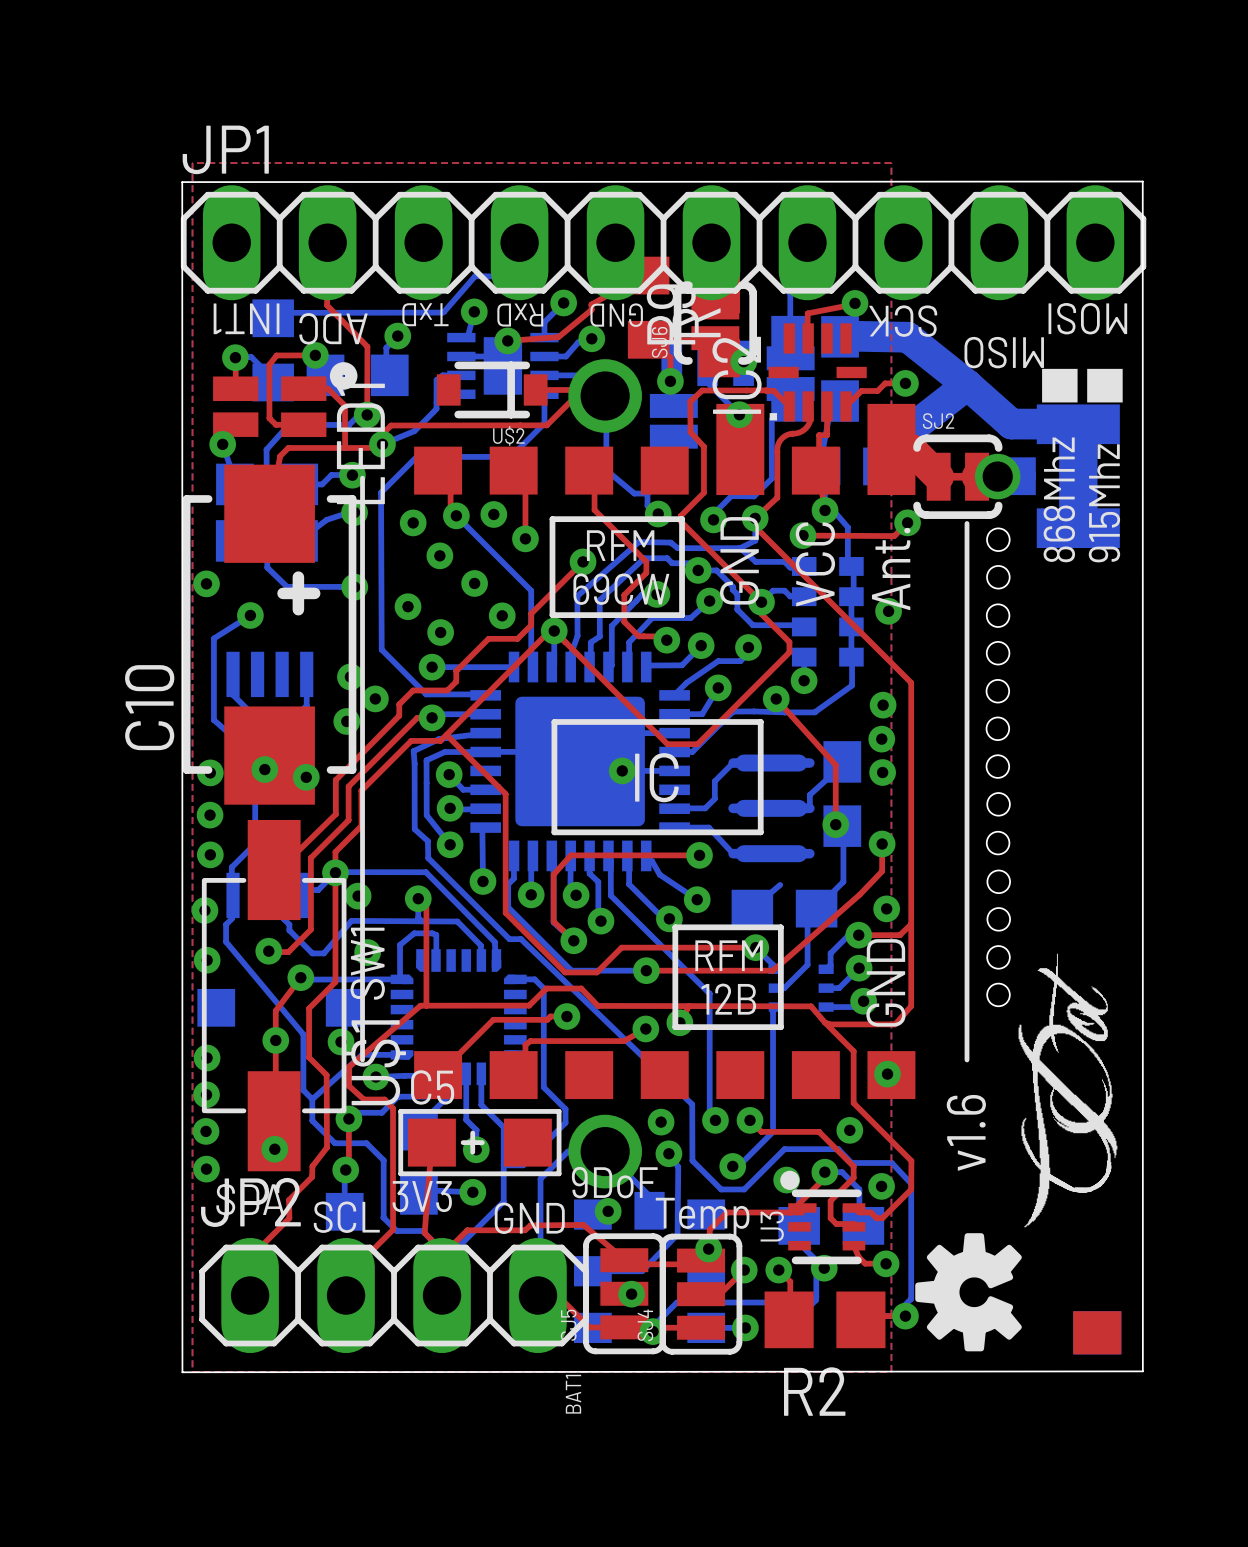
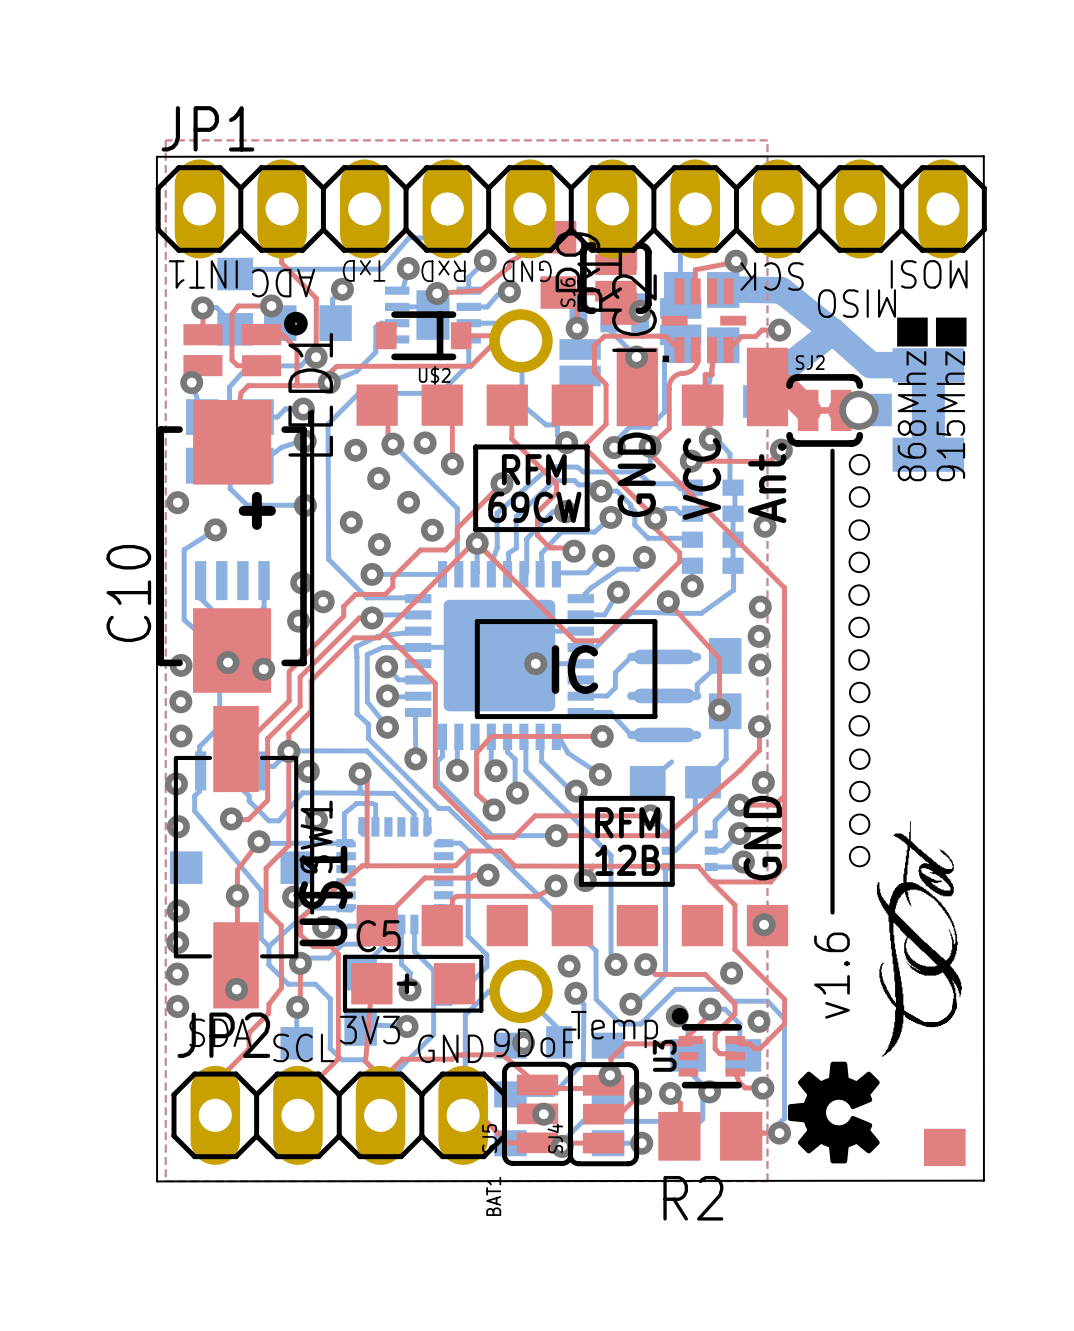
text position: 9DoF (614, 1182) -> 9DoF (535, 1042)
text position: Temp (702, 1217) -> Temp (614, 1029)

